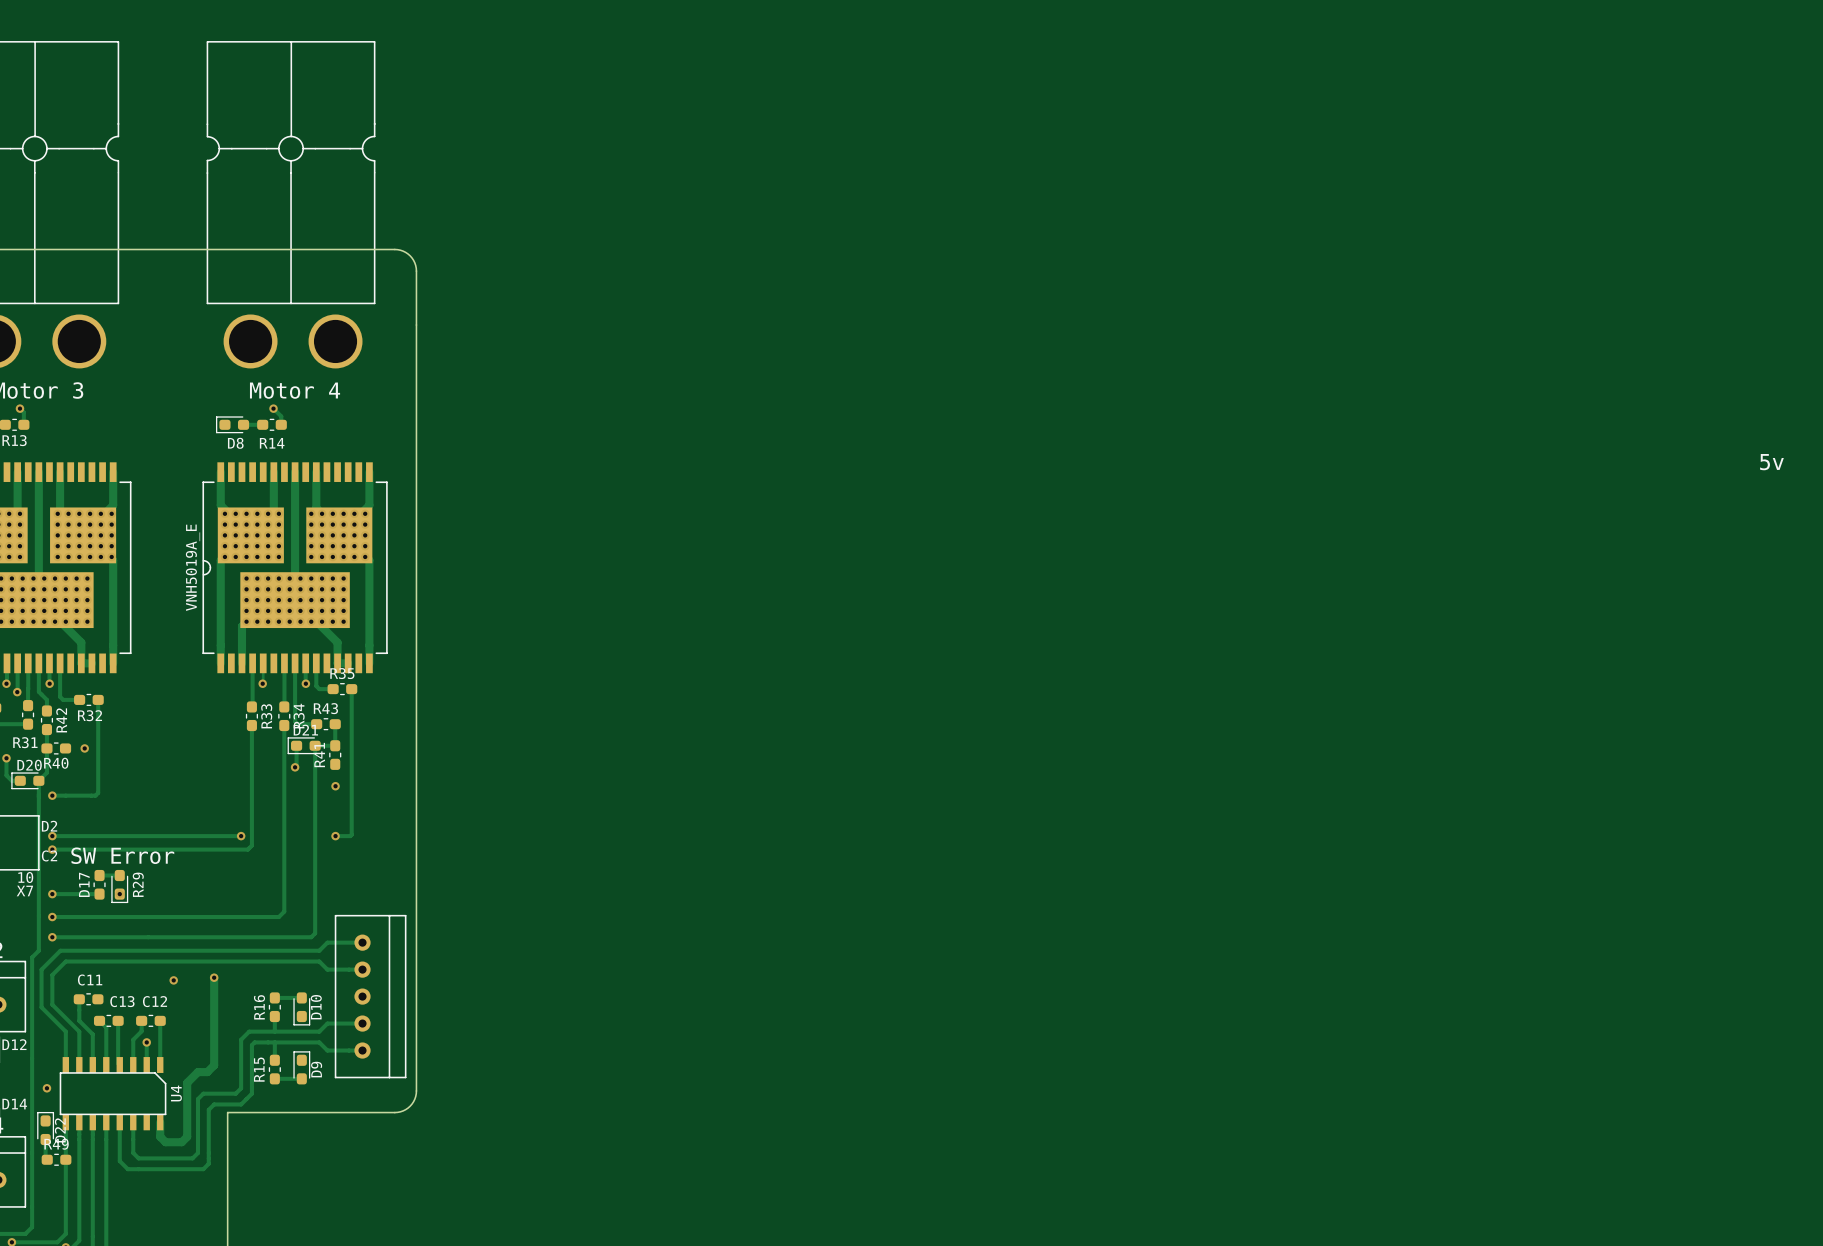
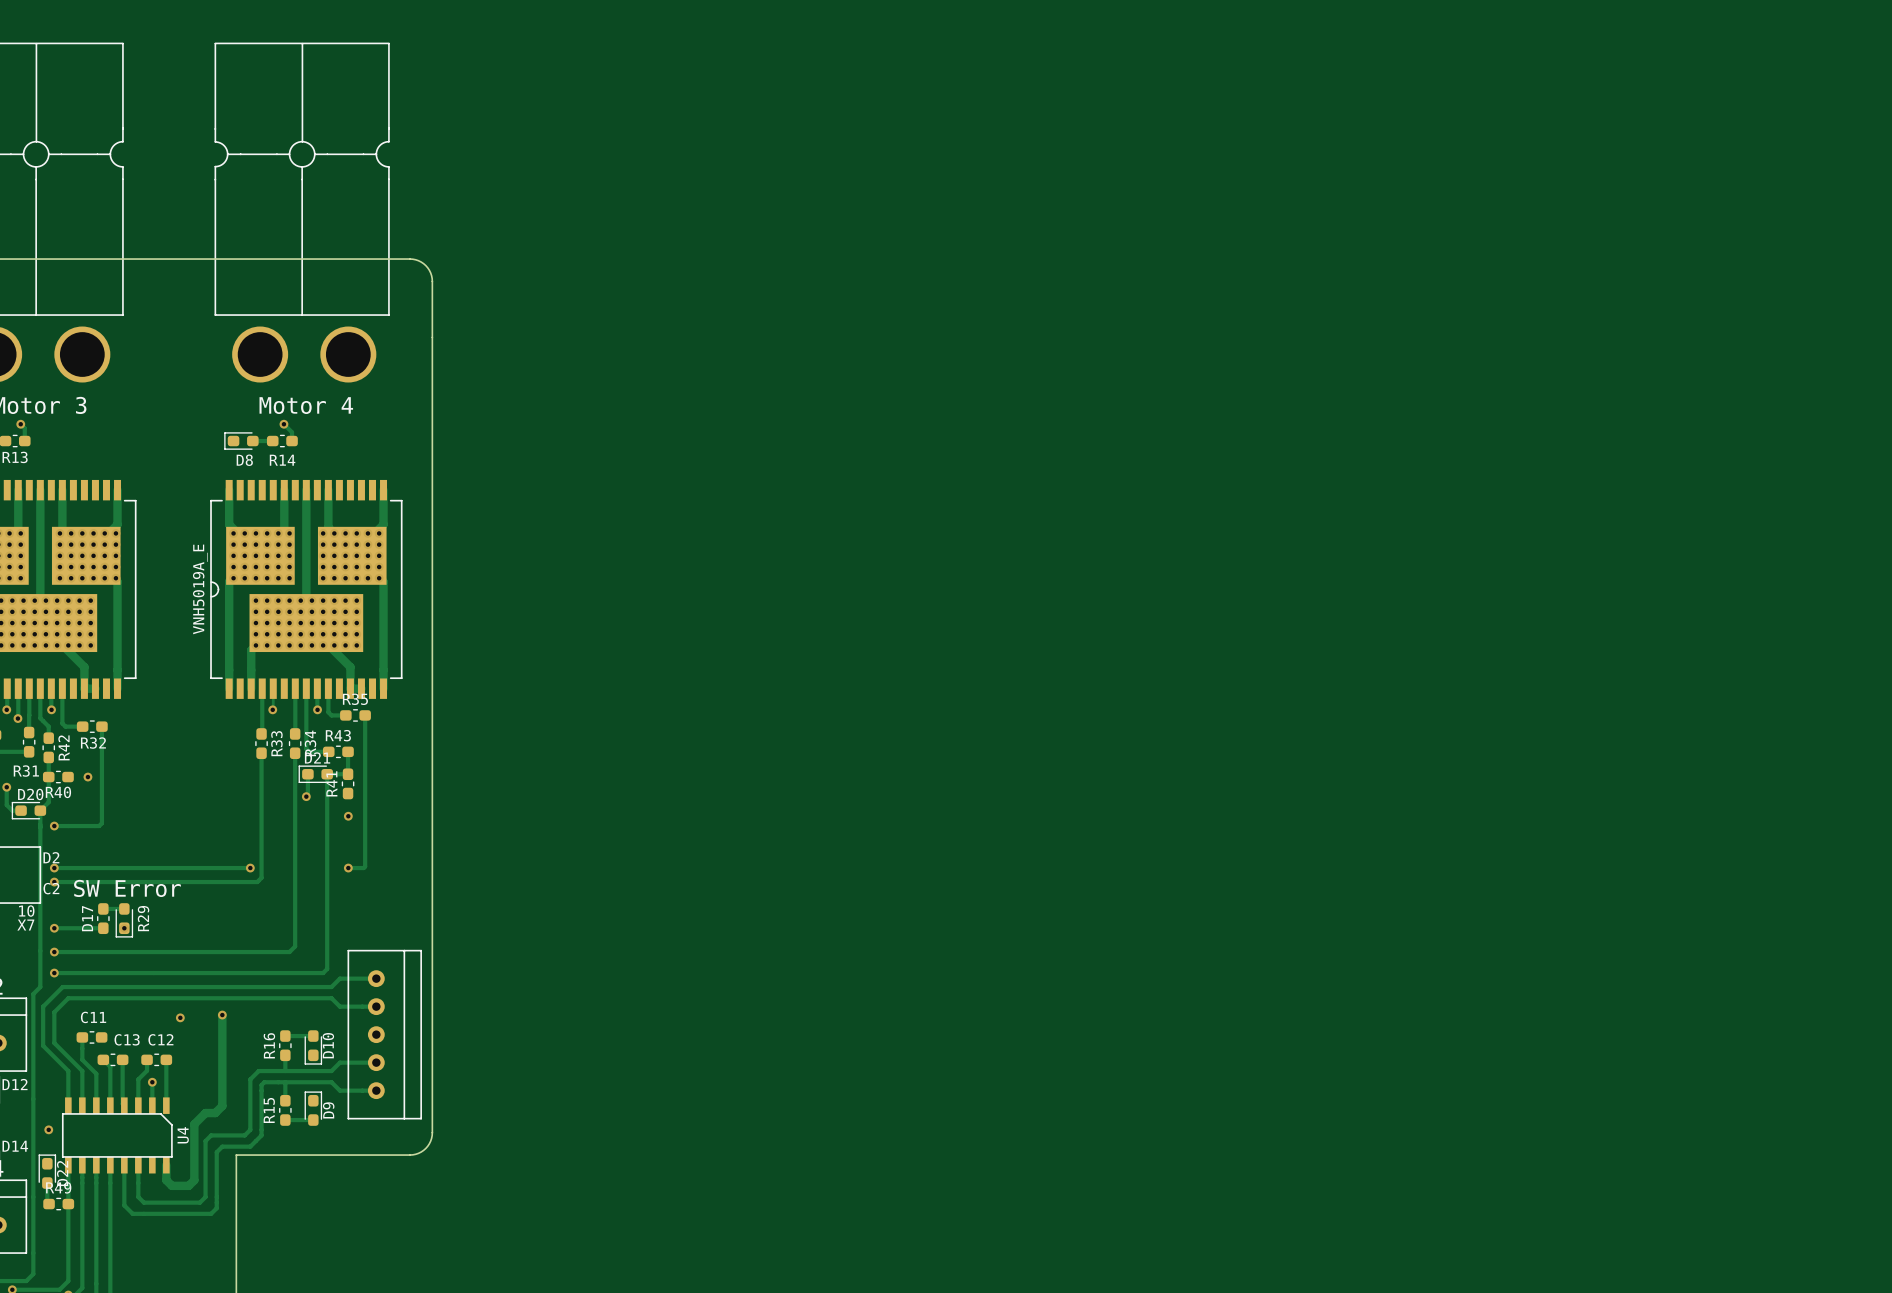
text: 5v (1771, 462) -> none

